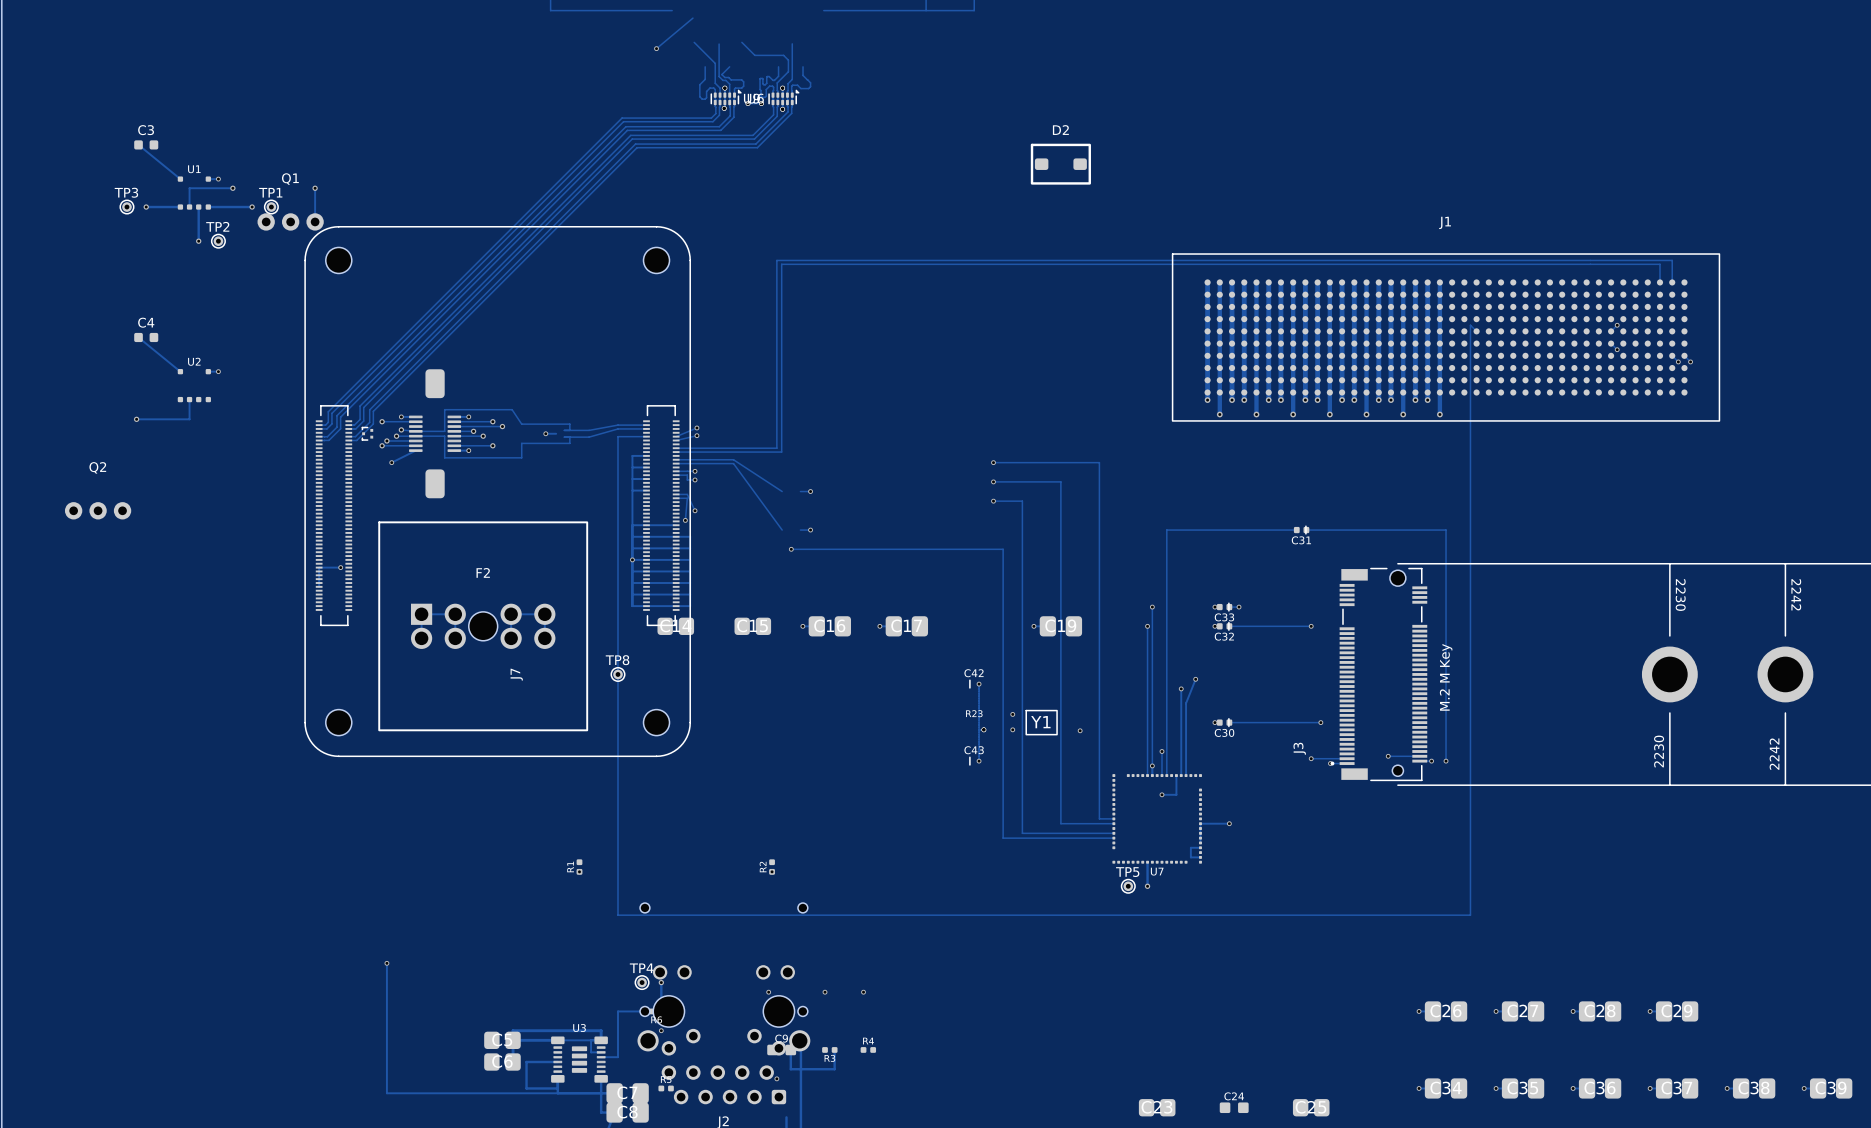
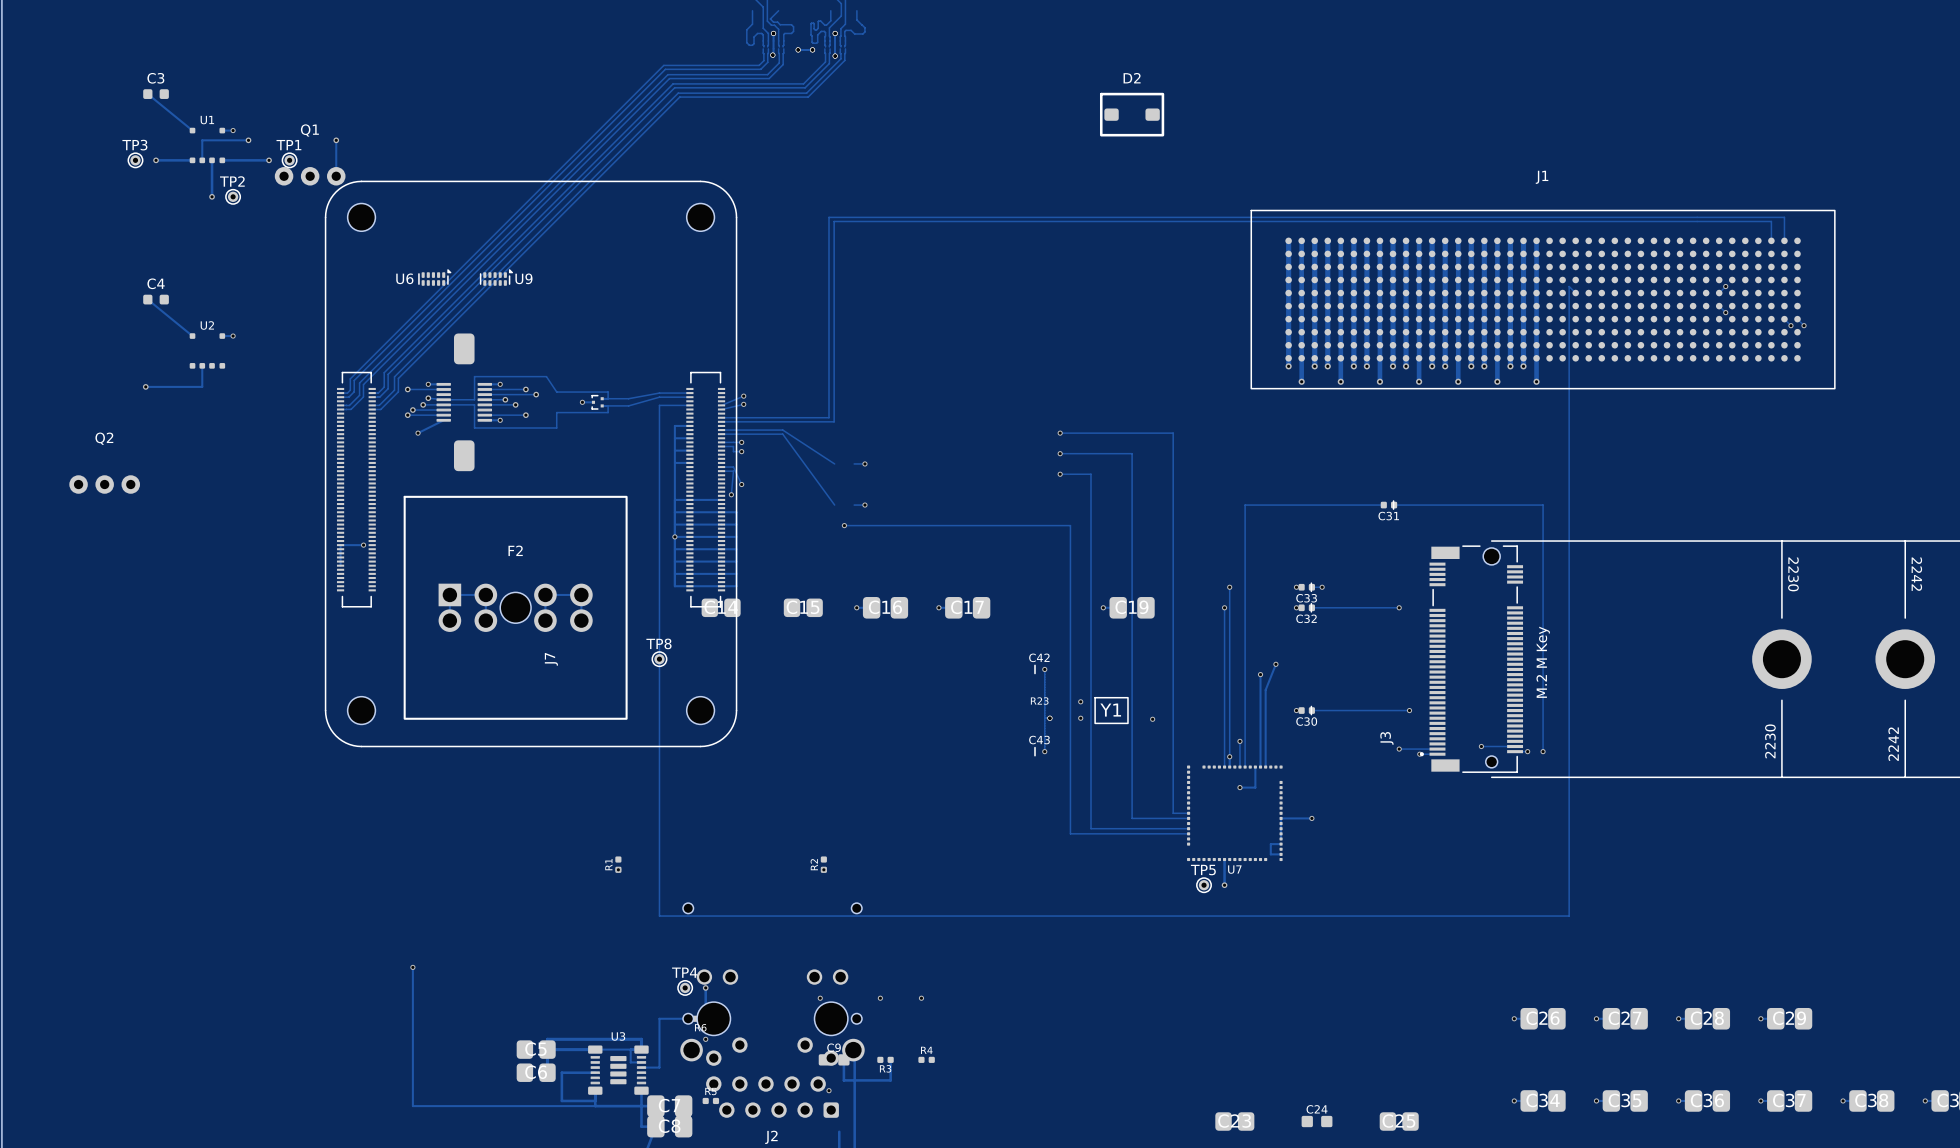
U9 position: (726, 97) -> (496, 277)
U6 position: (783, 97) -> (434, 277)
part position: (367, 433) -> (597, 402)

